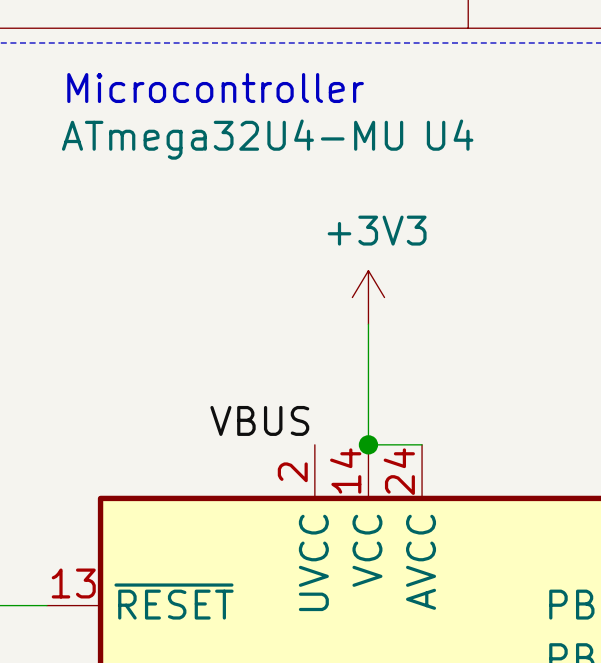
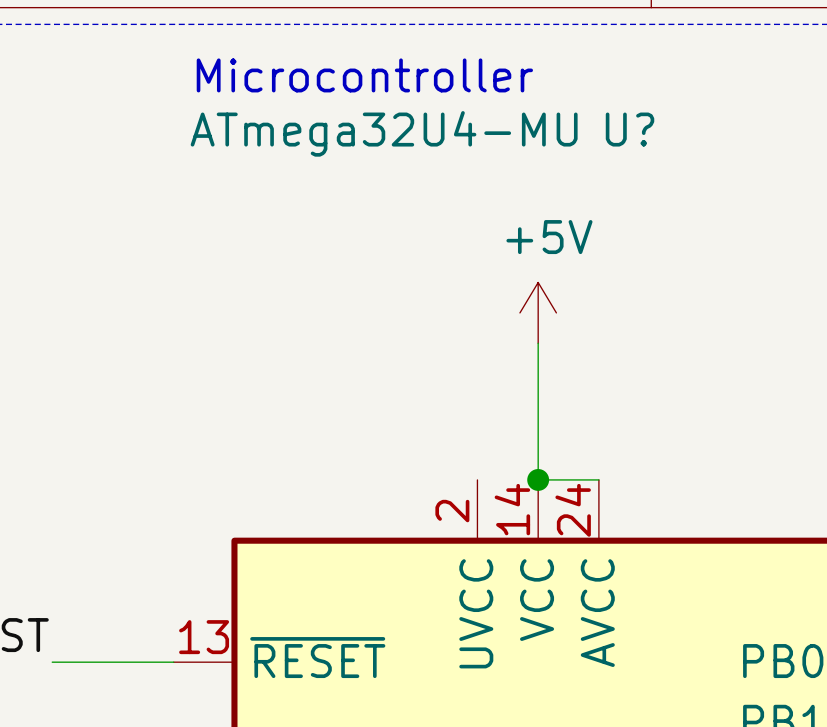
U4 name: U4 (450, 135) -> U? (630, 129)
power symbol: +3V3 (368, 297) -> +5V (538, 312)
label: VBUS (259, 420) -> none

